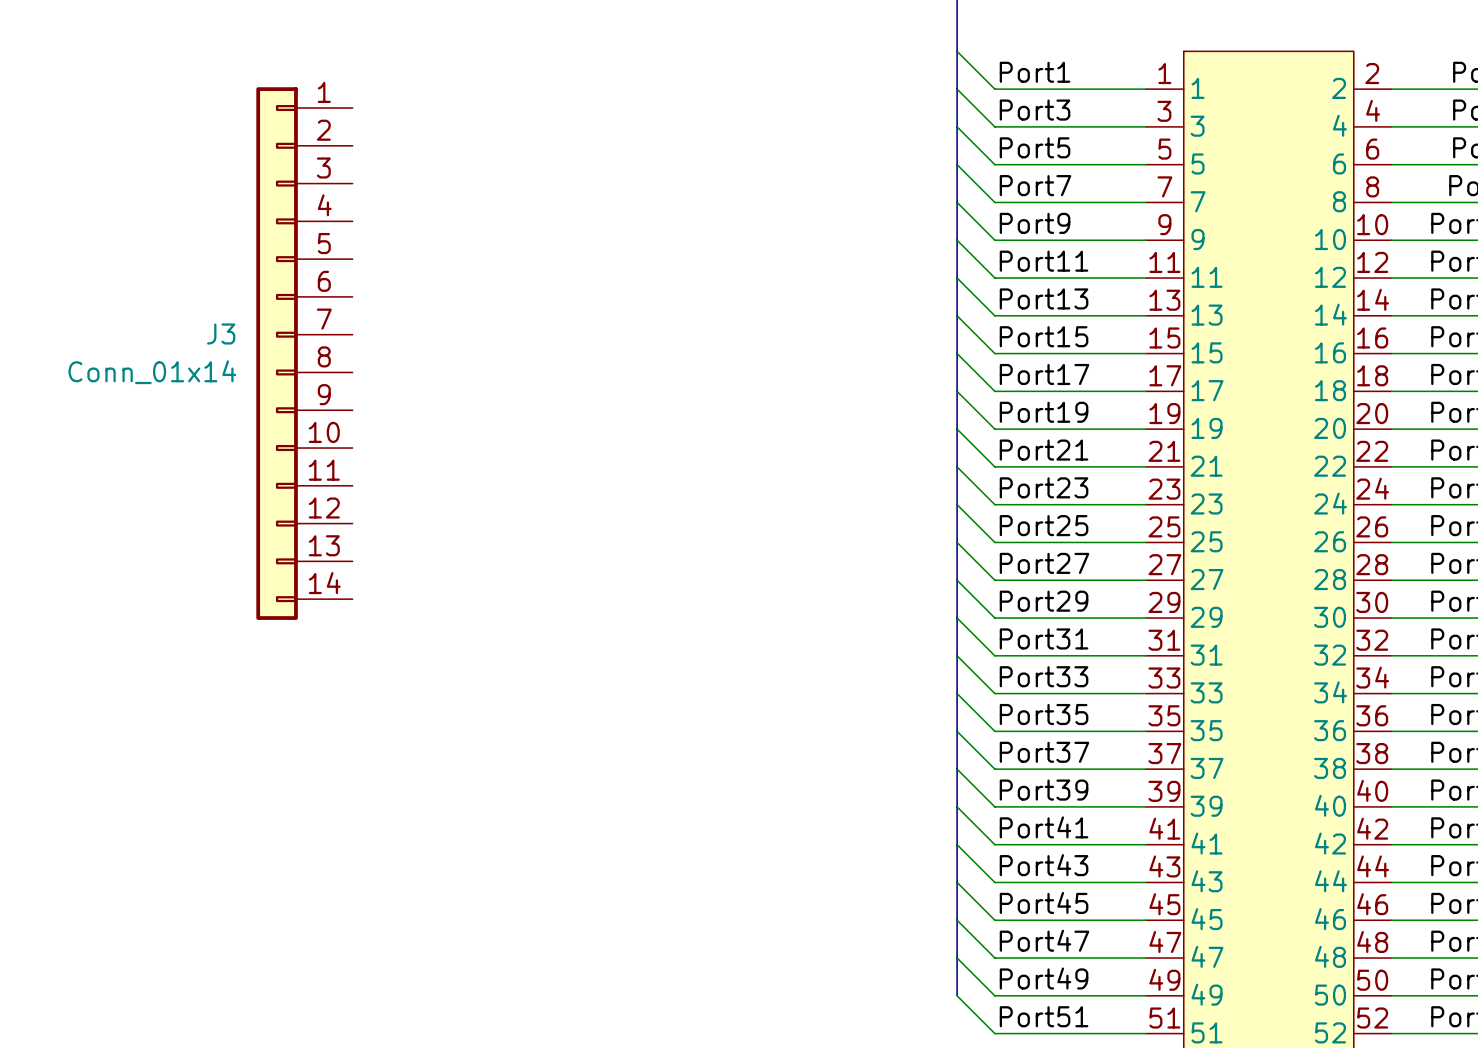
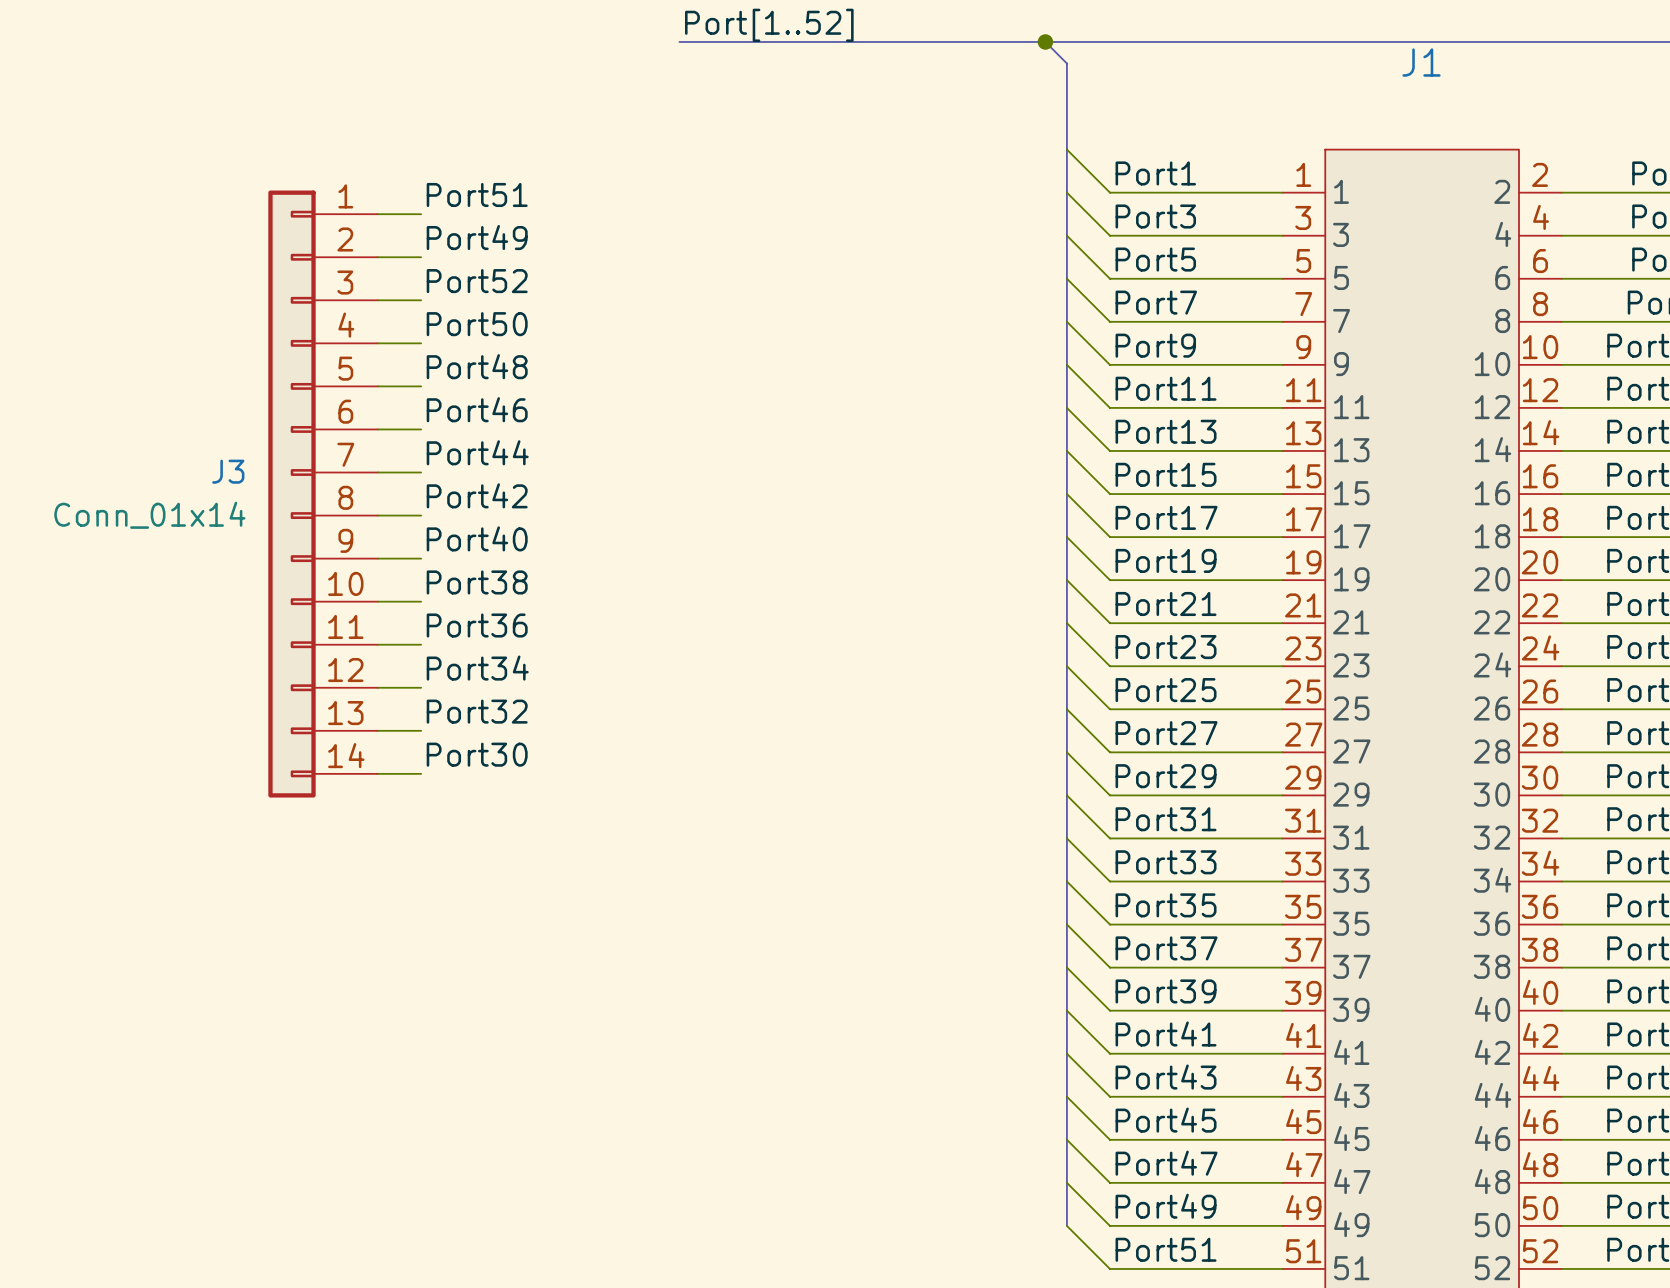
label: none -> Port51 (477, 194)
wire: none -> (378, 214) (421, 214)
label: none -> Port49 (477, 237)
wire: none -> (378, 257) (421, 257)
label: none -> Port52 (477, 281)
wire: none -> (378, 300) (421, 300)
label: none -> Port50 (477, 324)
wire: none -> (378, 343) (421, 343)
label: none -> Port48 (477, 366)
wire: none -> (378, 386) (421, 386)
label: none -> Port46 (477, 409)
wire: none -> (378, 429) (421, 429)
label: none -> Port44 (477, 452)
wire: none -> (378, 472) (421, 472)
label: none -> Port42 (477, 495)
wire: none -> (378, 515) (421, 515)
label: none -> Port40 (477, 538)
wire: none -> (378, 558) (421, 558)
label: none -> Port38 (477, 582)
wire: none -> (378, 601) (421, 601)
label: none -> Port36 (477, 625)
wire: none -> (378, 644) (421, 644)
label: none -> Port34 (477, 668)
wire: none -> (378, 687) (421, 687)
label: none -> Port32 (477, 711)
wire: none -> (378, 730) (421, 730)
label: none -> Port30 (477, 754)
wire: none -> (378, 773) (421, 773)

